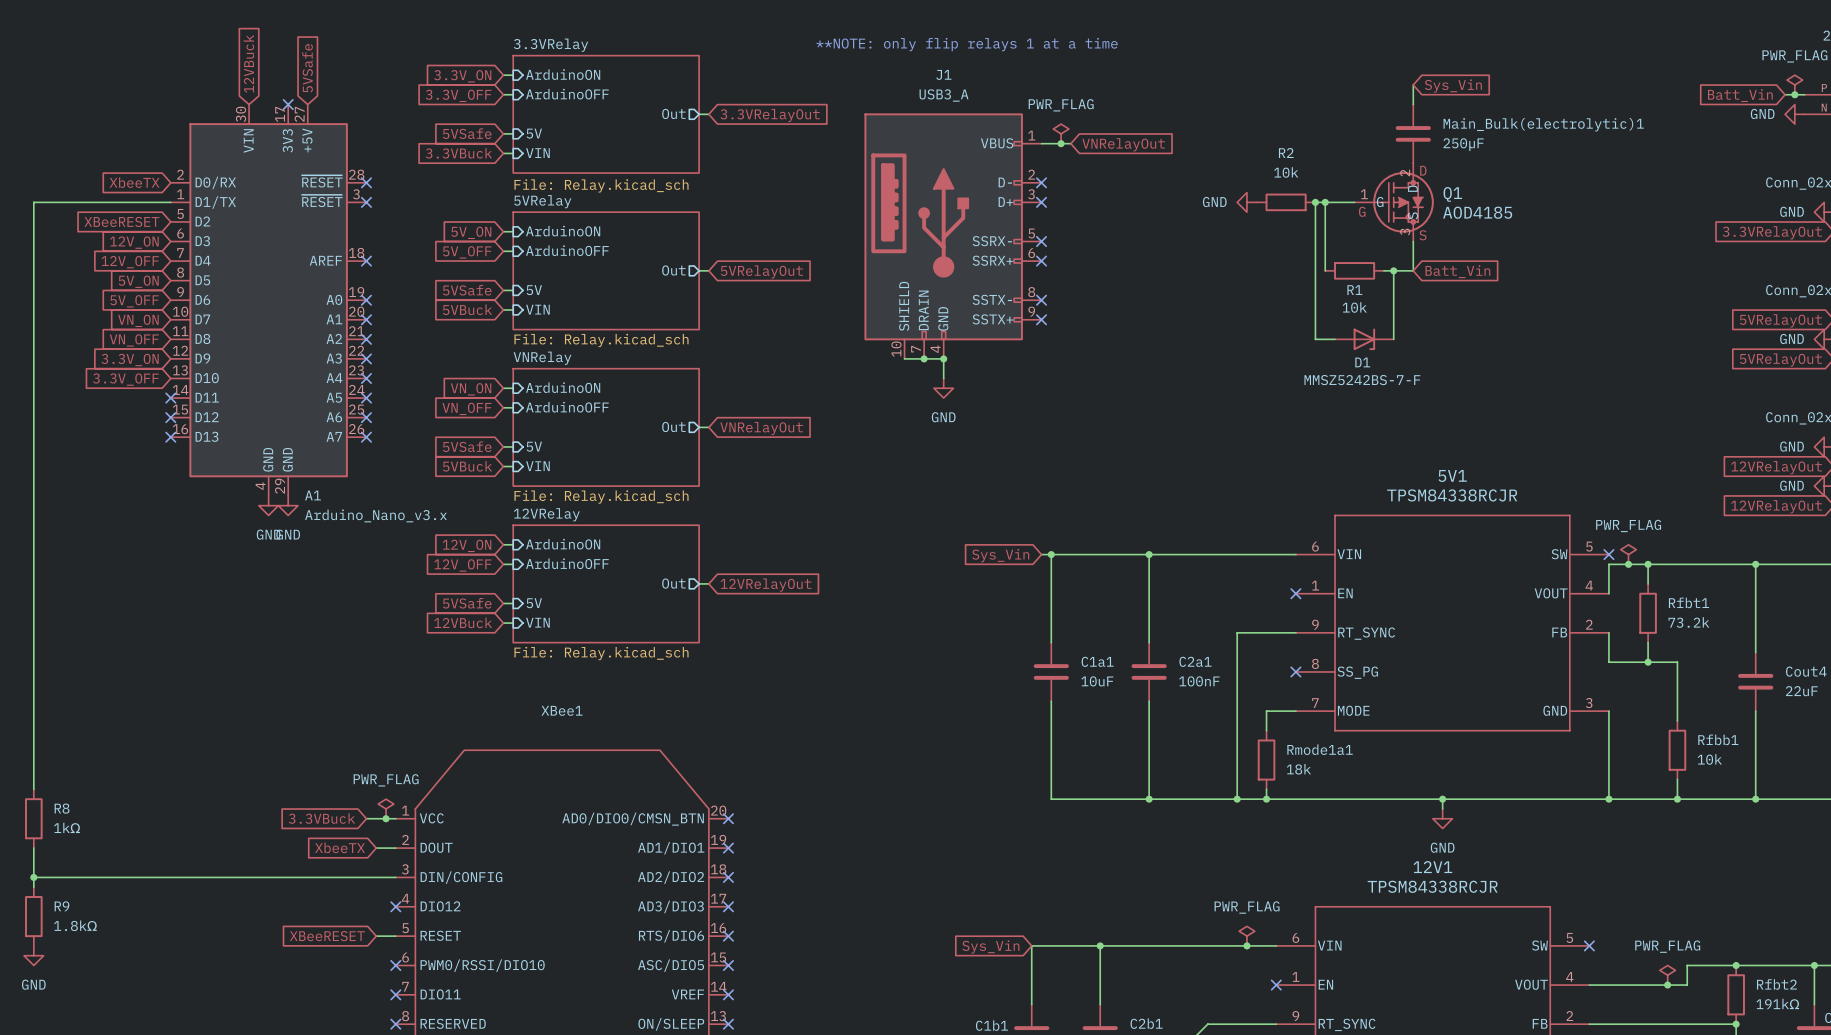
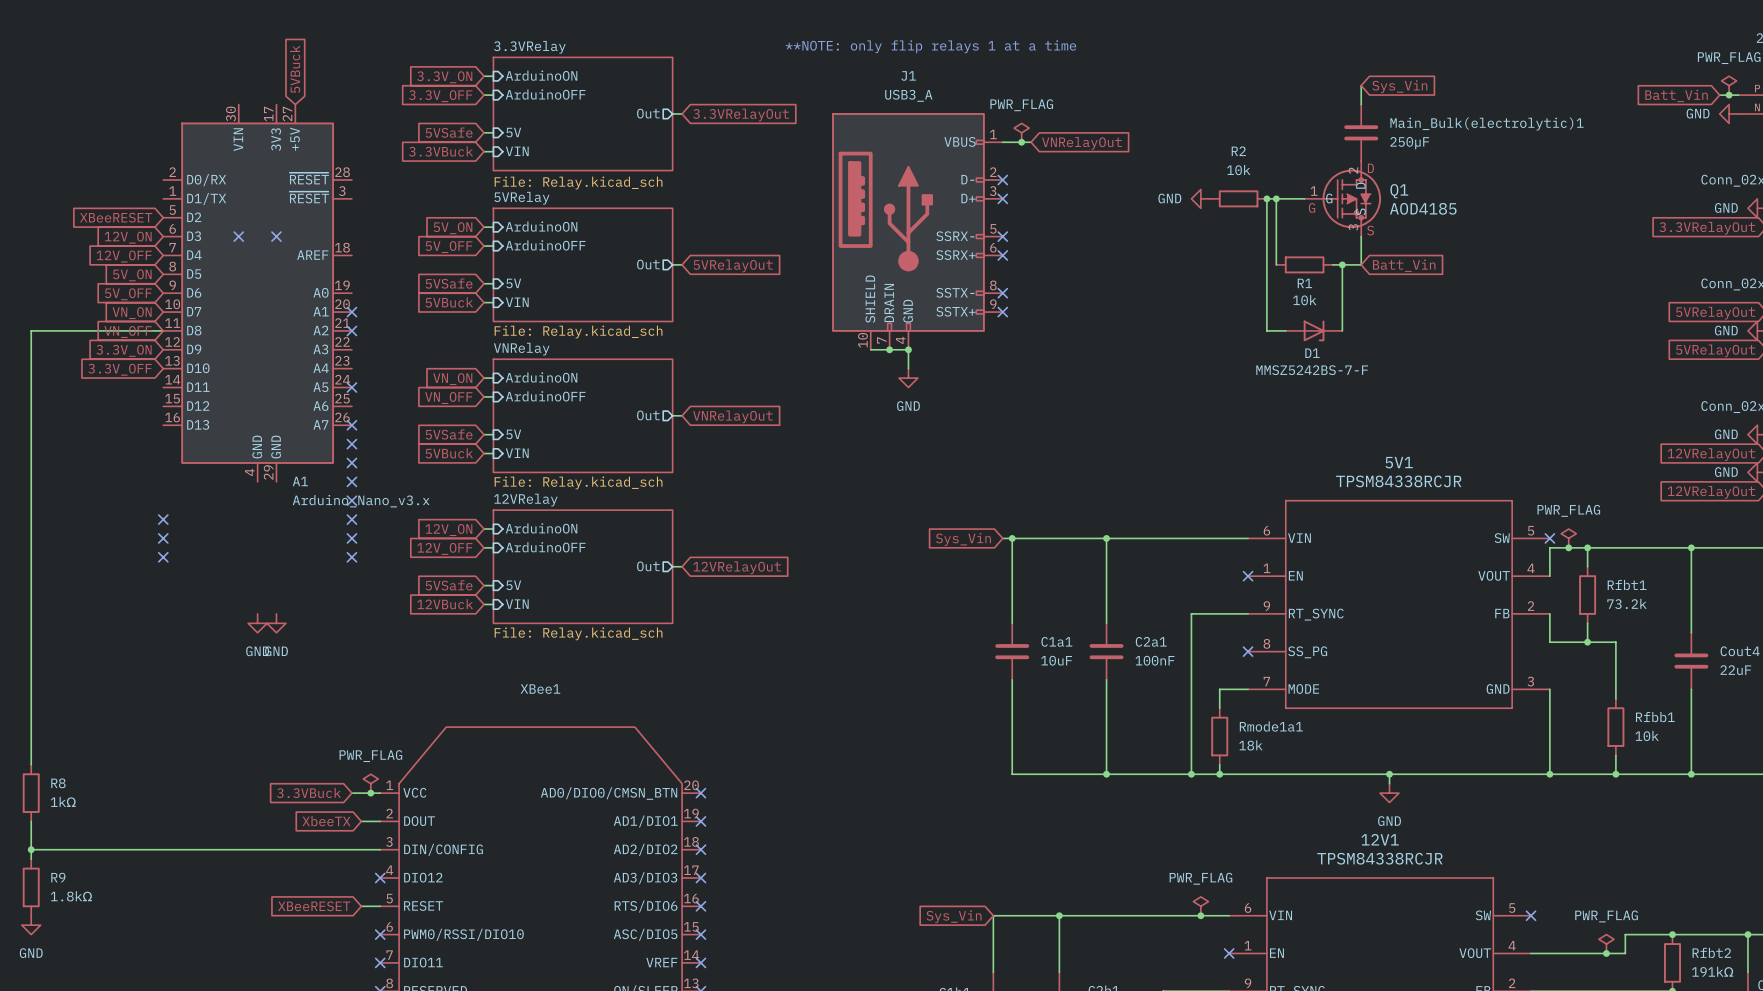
global label: 12VBuck (248, 63) -> none
global label: 5VSafe (307, 68) -> 5VBuck (295, 69)
no-connect mark: (288, 104) -> none
global label: XbeeTX (134, 182) -> none
no-connect mark: (366, 182) -> none
wire: (170, 202) (33, 202) (33, 339) -> (163, 330) (31, 330)
no-connect mark: (366, 202) -> none
no-connect mark: none -> (238, 236)
no-connect mark: none -> (276, 236)
no-connect mark: (366, 261) -> none
no-connect mark: (366, 300) -> none
no-connect mark: (366, 358) -> none
no-connect mark: (366, 378) -> none
no-connect mark: (170, 398) -> none
no-connect mark: (170, 417) -> none
no-connect mark: (366, 417) -> none
no-connect mark: (170, 437) -> none
no-connect mark: none -> (351, 444)
no-connect mark: none -> (351, 462)
no-connect mark: none -> (351, 481)
power symbol: GND (268, 505) -> none
power symbol: GND (288, 505) -> none
no-connect mark: none -> (351, 500)
no-connect mark: none -> (163, 519)
no-connect mark: none -> (351, 519)
no-connect mark: none -> (163, 538)
no-connect mark: none -> (351, 538)
no-connect mark: none -> (163, 557)
no-connect mark: none -> (351, 557)
power symbol: none -> GND (257, 623)
power symbol: none -> GND (276, 623)

